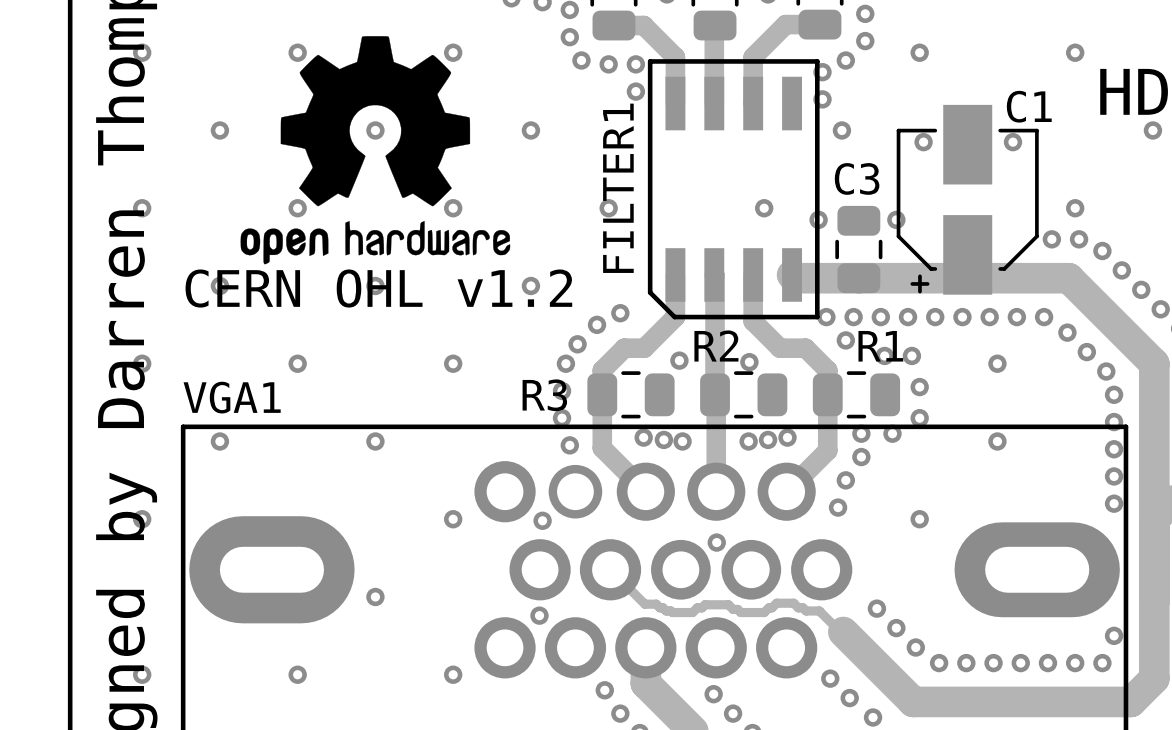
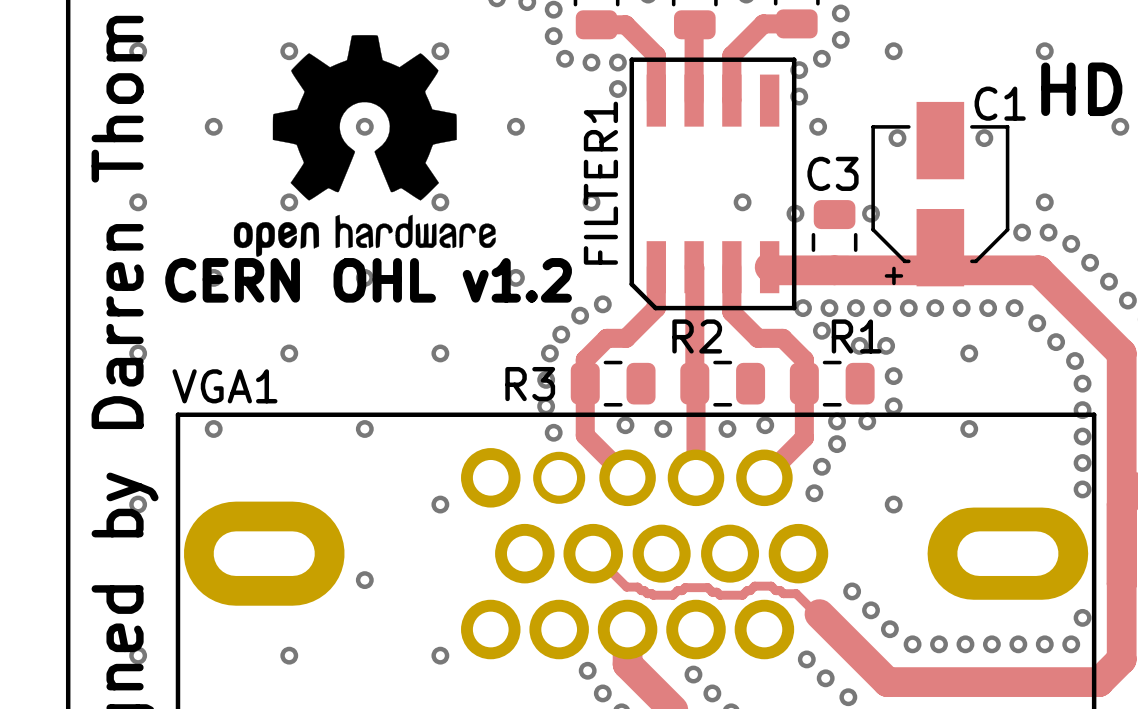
via: (679, 360) -> none
via: (749, 362) -> none
via: (663, 439) -> none
via: (768, 439) -> none
via: (542, 520) -> none
via: (716, 542) -> none
via: (539, 615) -> none

